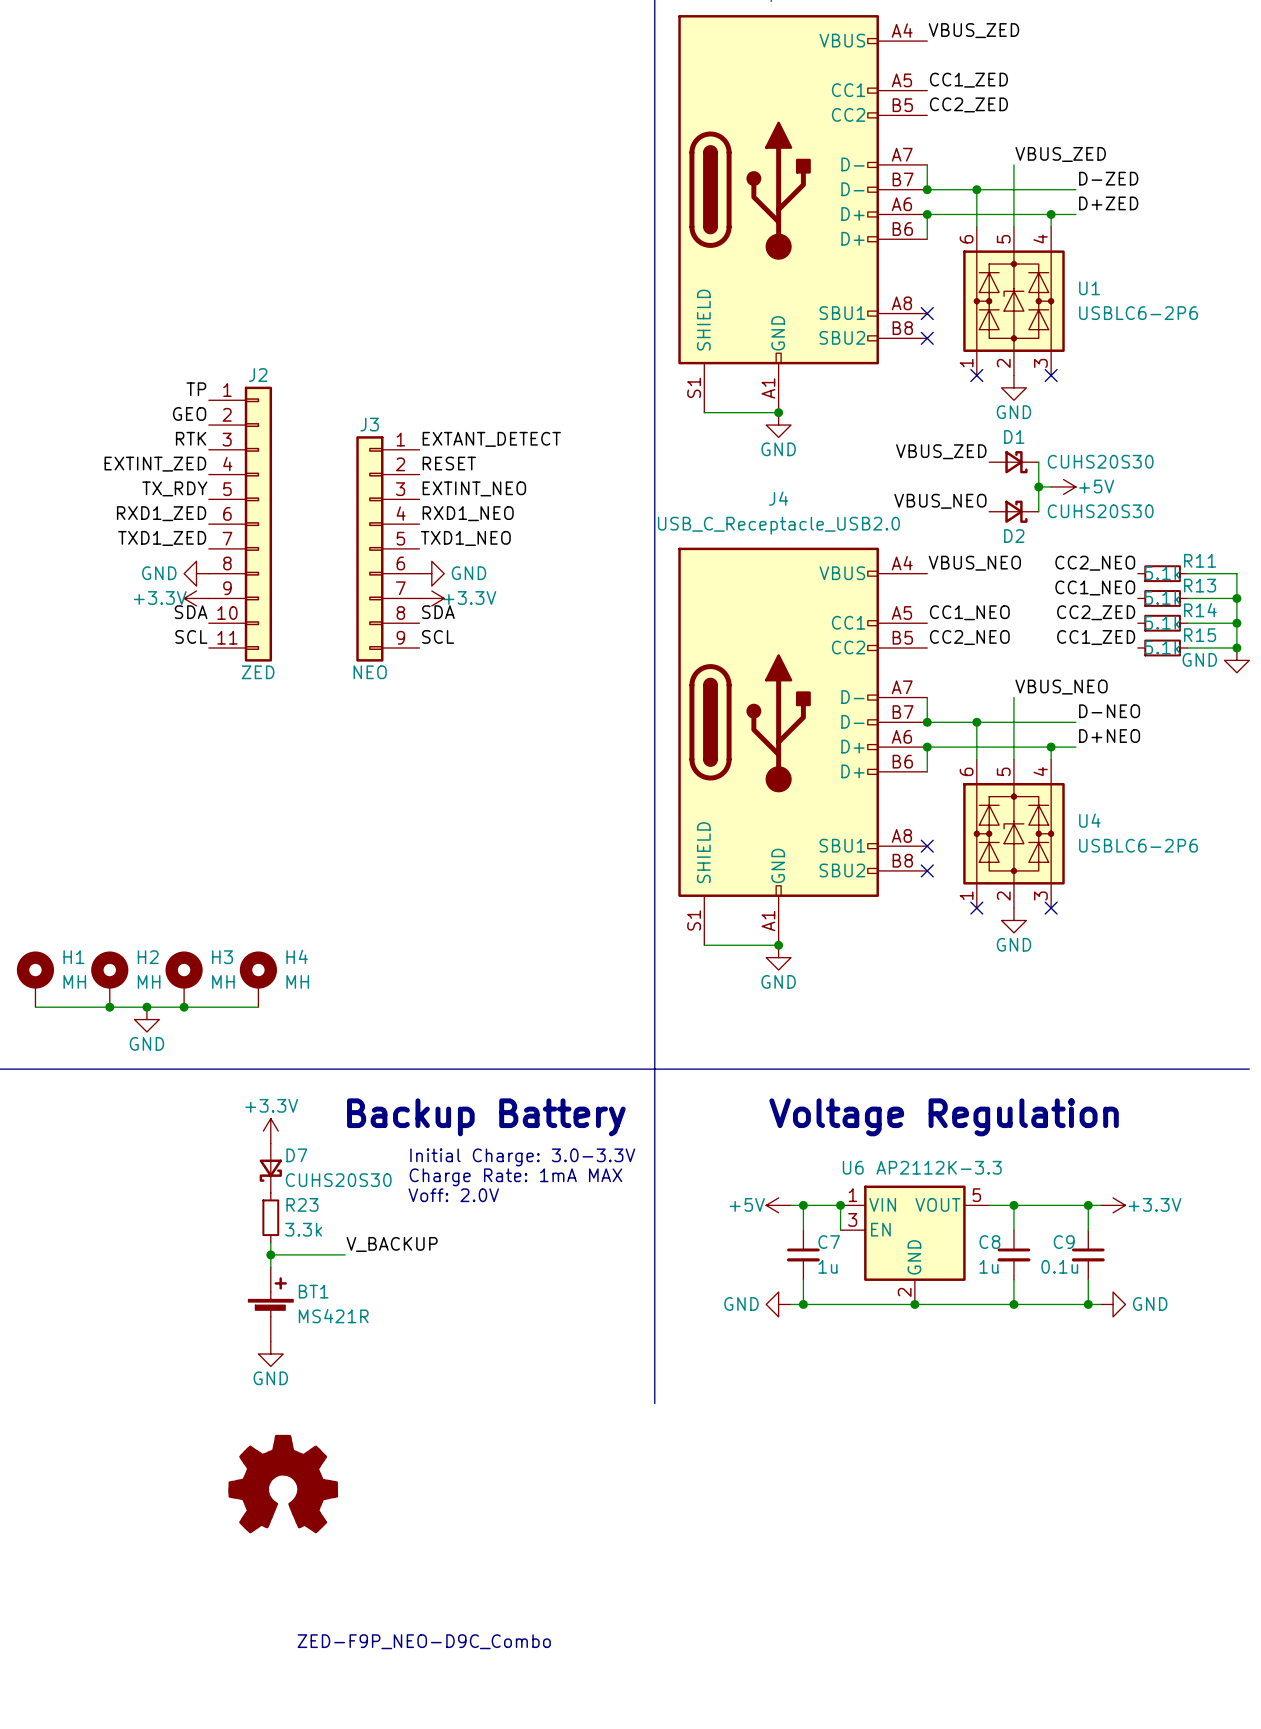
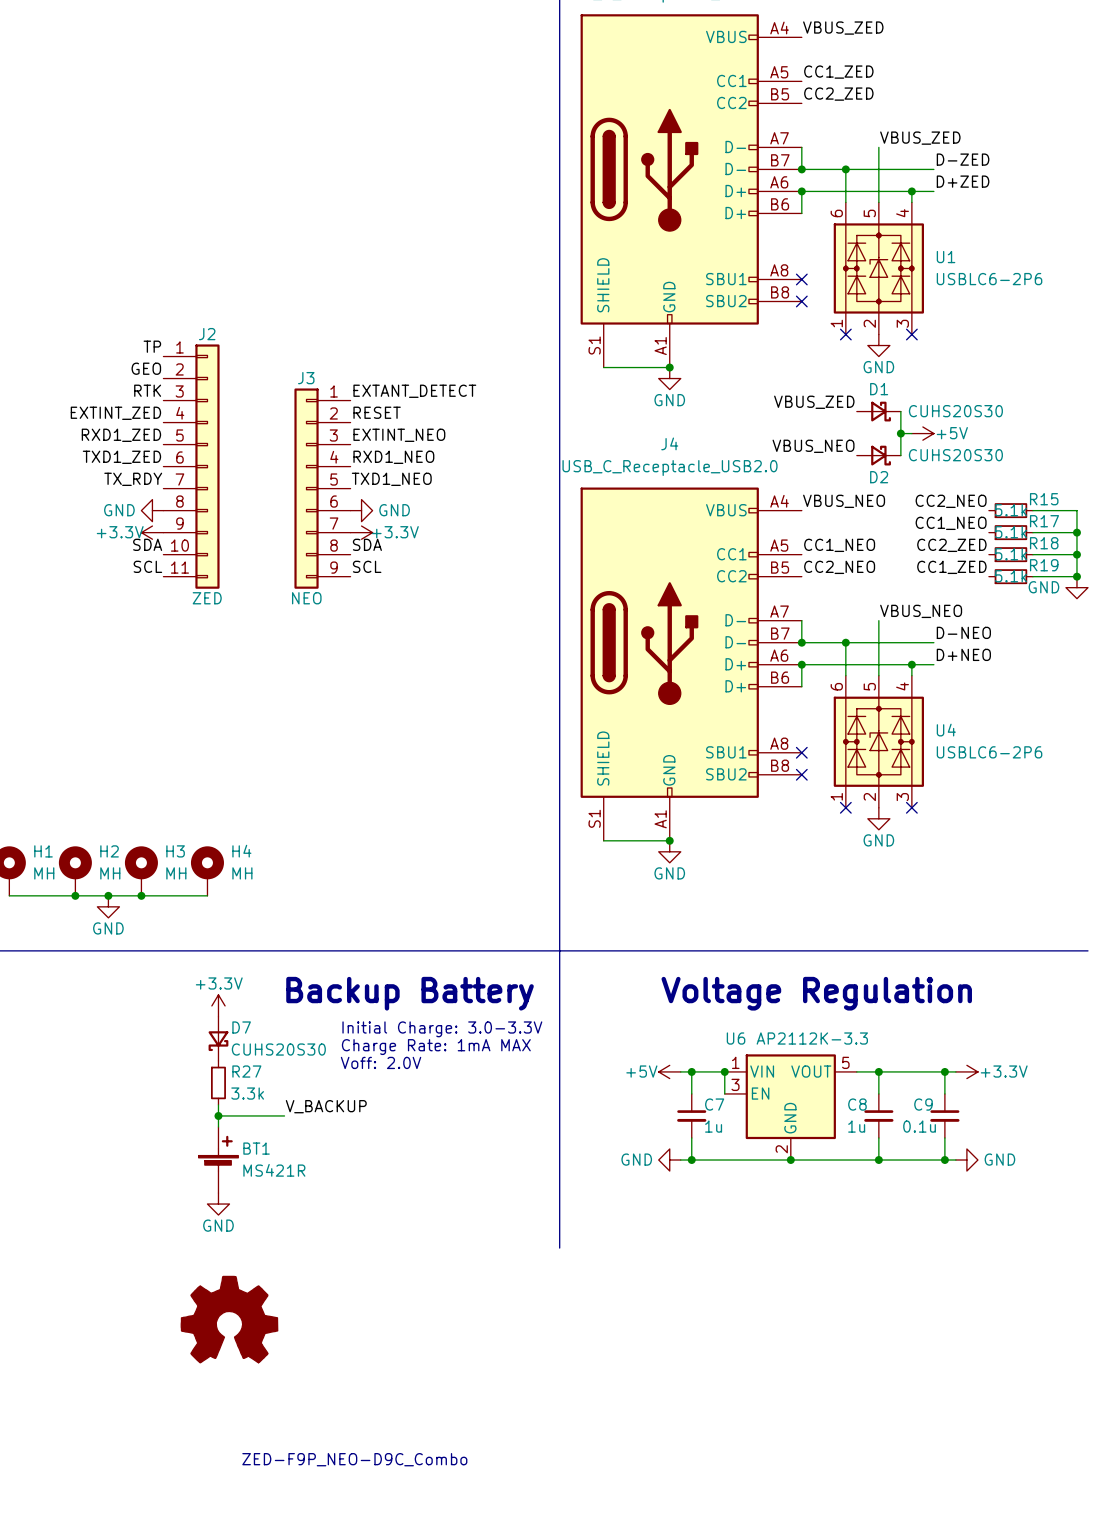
label: TX_RDY (174, 488) -> RXD1_ZED (121, 435)
label: RXD1_ZED (161, 513) -> TXD1_ZED (121, 457)
label: TXD1_ZED (162, 538) -> TX_RDY (133, 479)
R11 name: R11 (1200, 560) -> R15 (1044, 499)
R13 name: R13 (1200, 585) -> R17 (1044, 521)
R14 name: R14 (1200, 610) -> R18 (1044, 543)
R15 name: R15 (1200, 635) -> R19 (1044, 565)
R23 name: R23 (302, 1204) -> R27 (246, 1071)

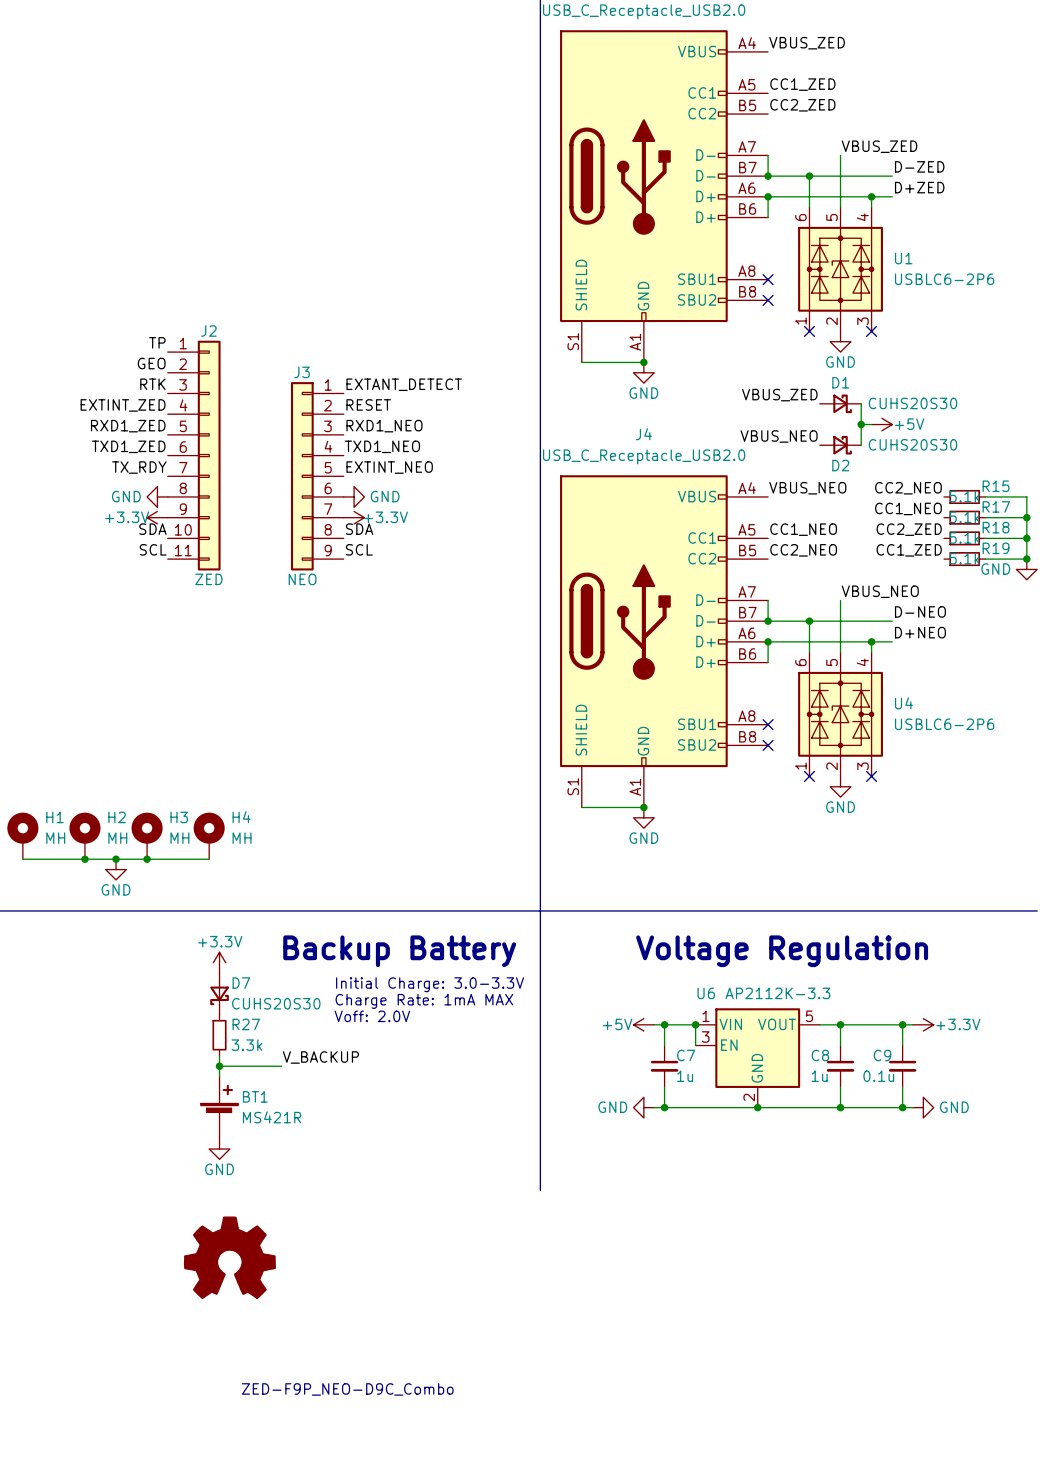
label: EXTINT_NEO (399, 435) -> RXD1_NEO (384, 426)
label: RXD1_NEO (393, 457) -> TXD1_NEO (382, 446)
label: TXD1_NEO (391, 479) -> EXTINT_NEO (389, 467)

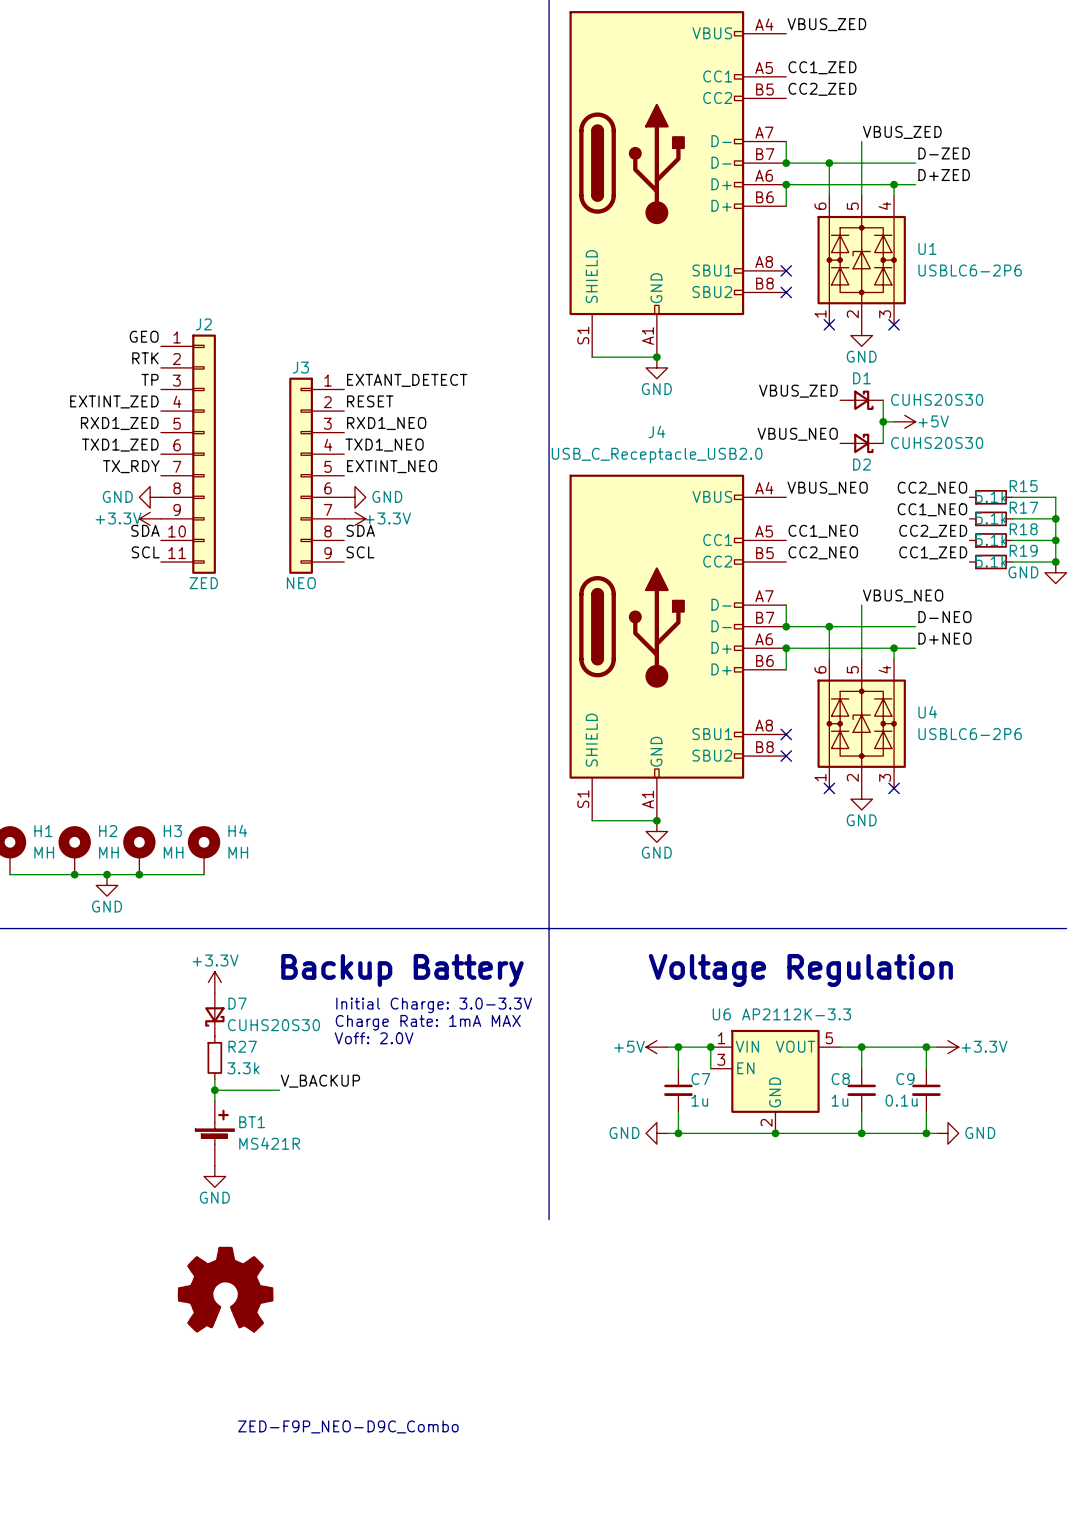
label: TP (157, 342) -> GEO (144, 336)
label: GEO (151, 363) -> RTK (145, 358)
label: RTK (152, 384) -> TP (150, 379)

